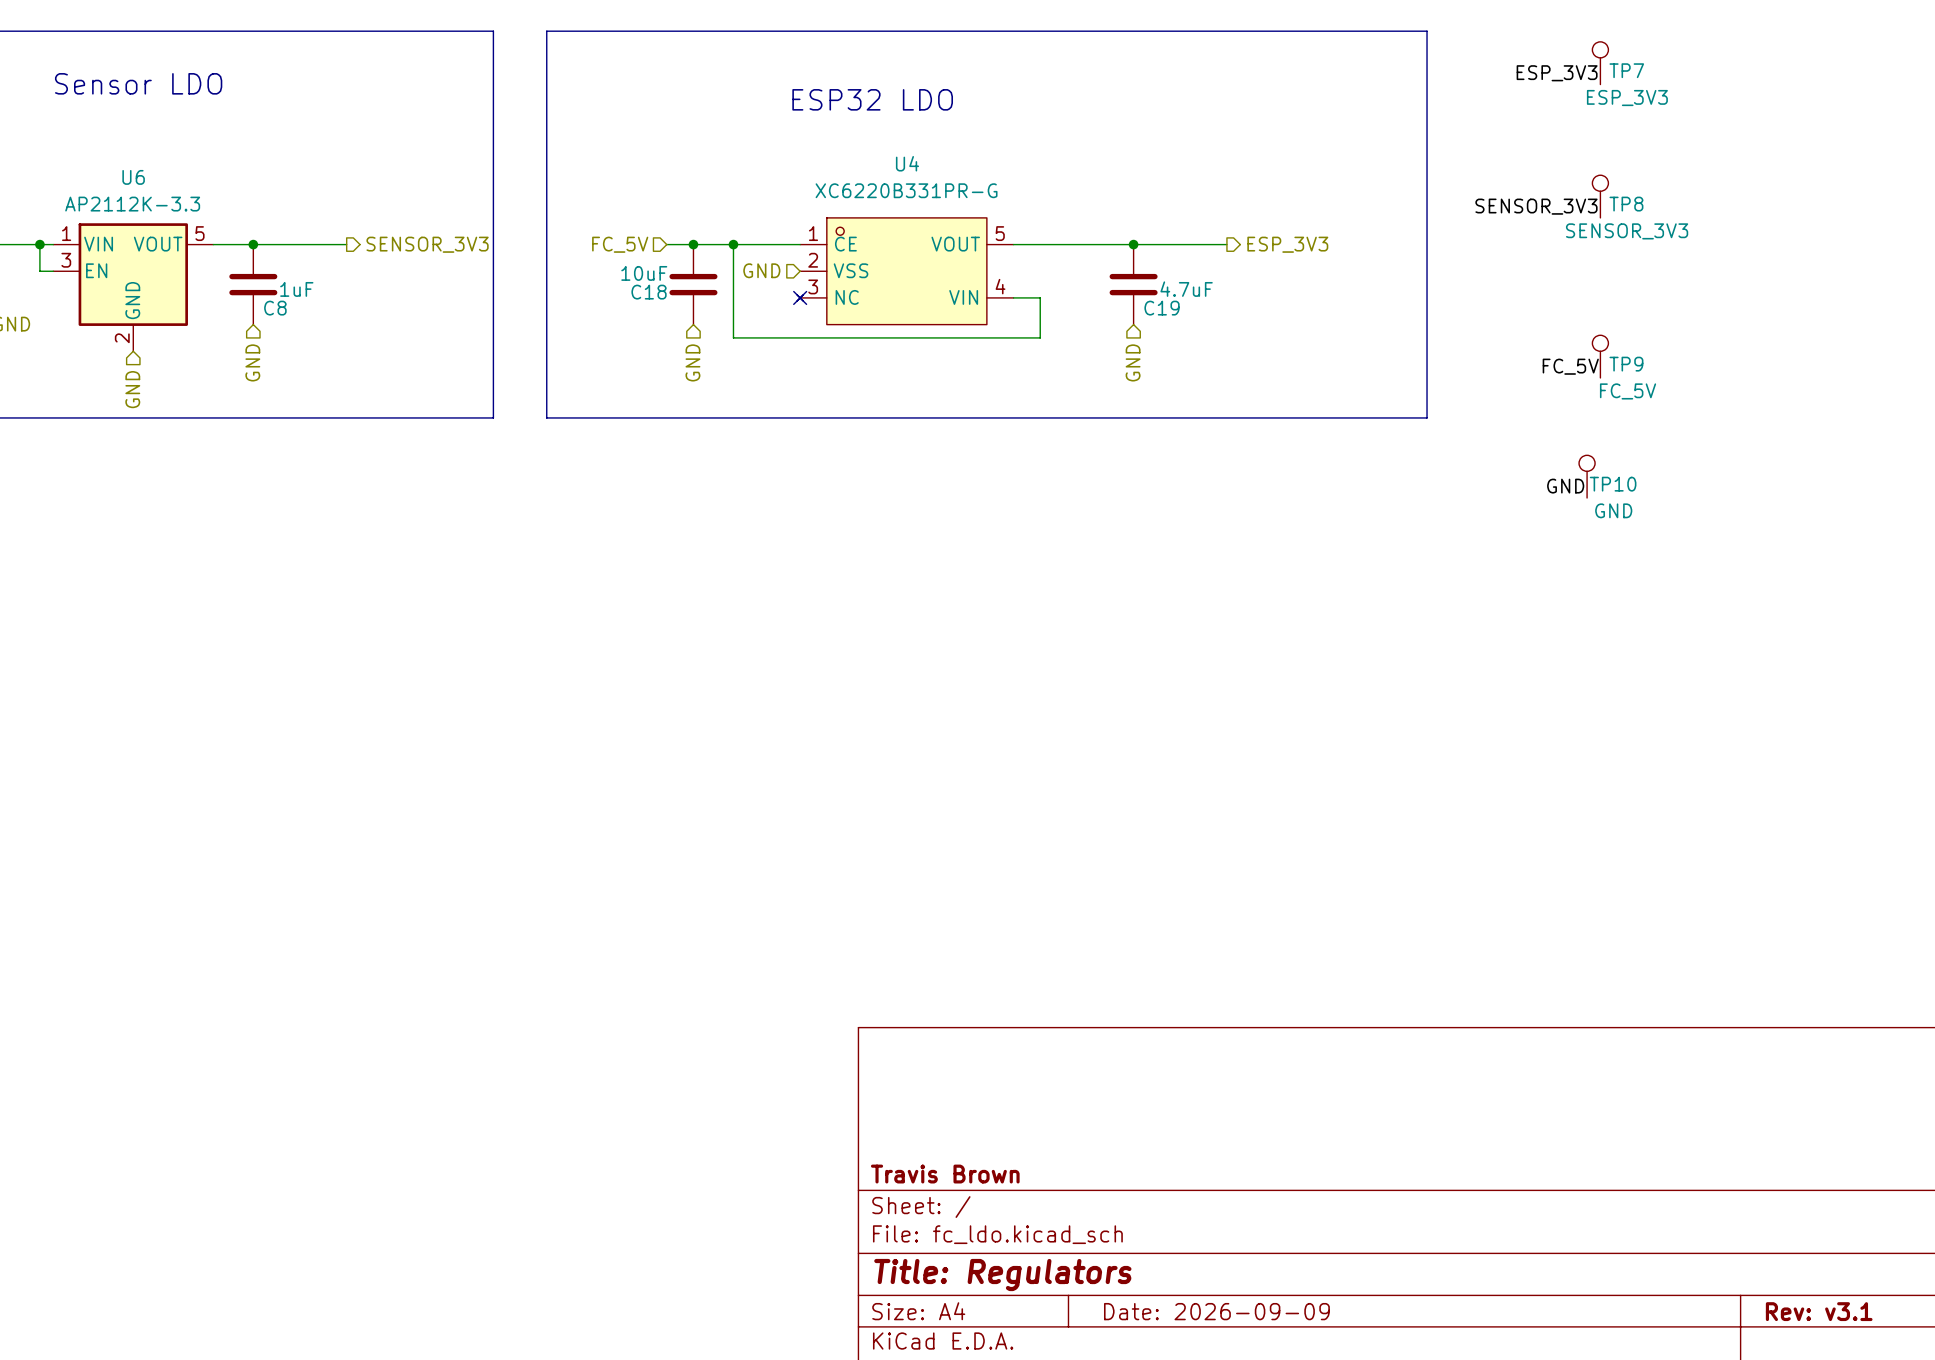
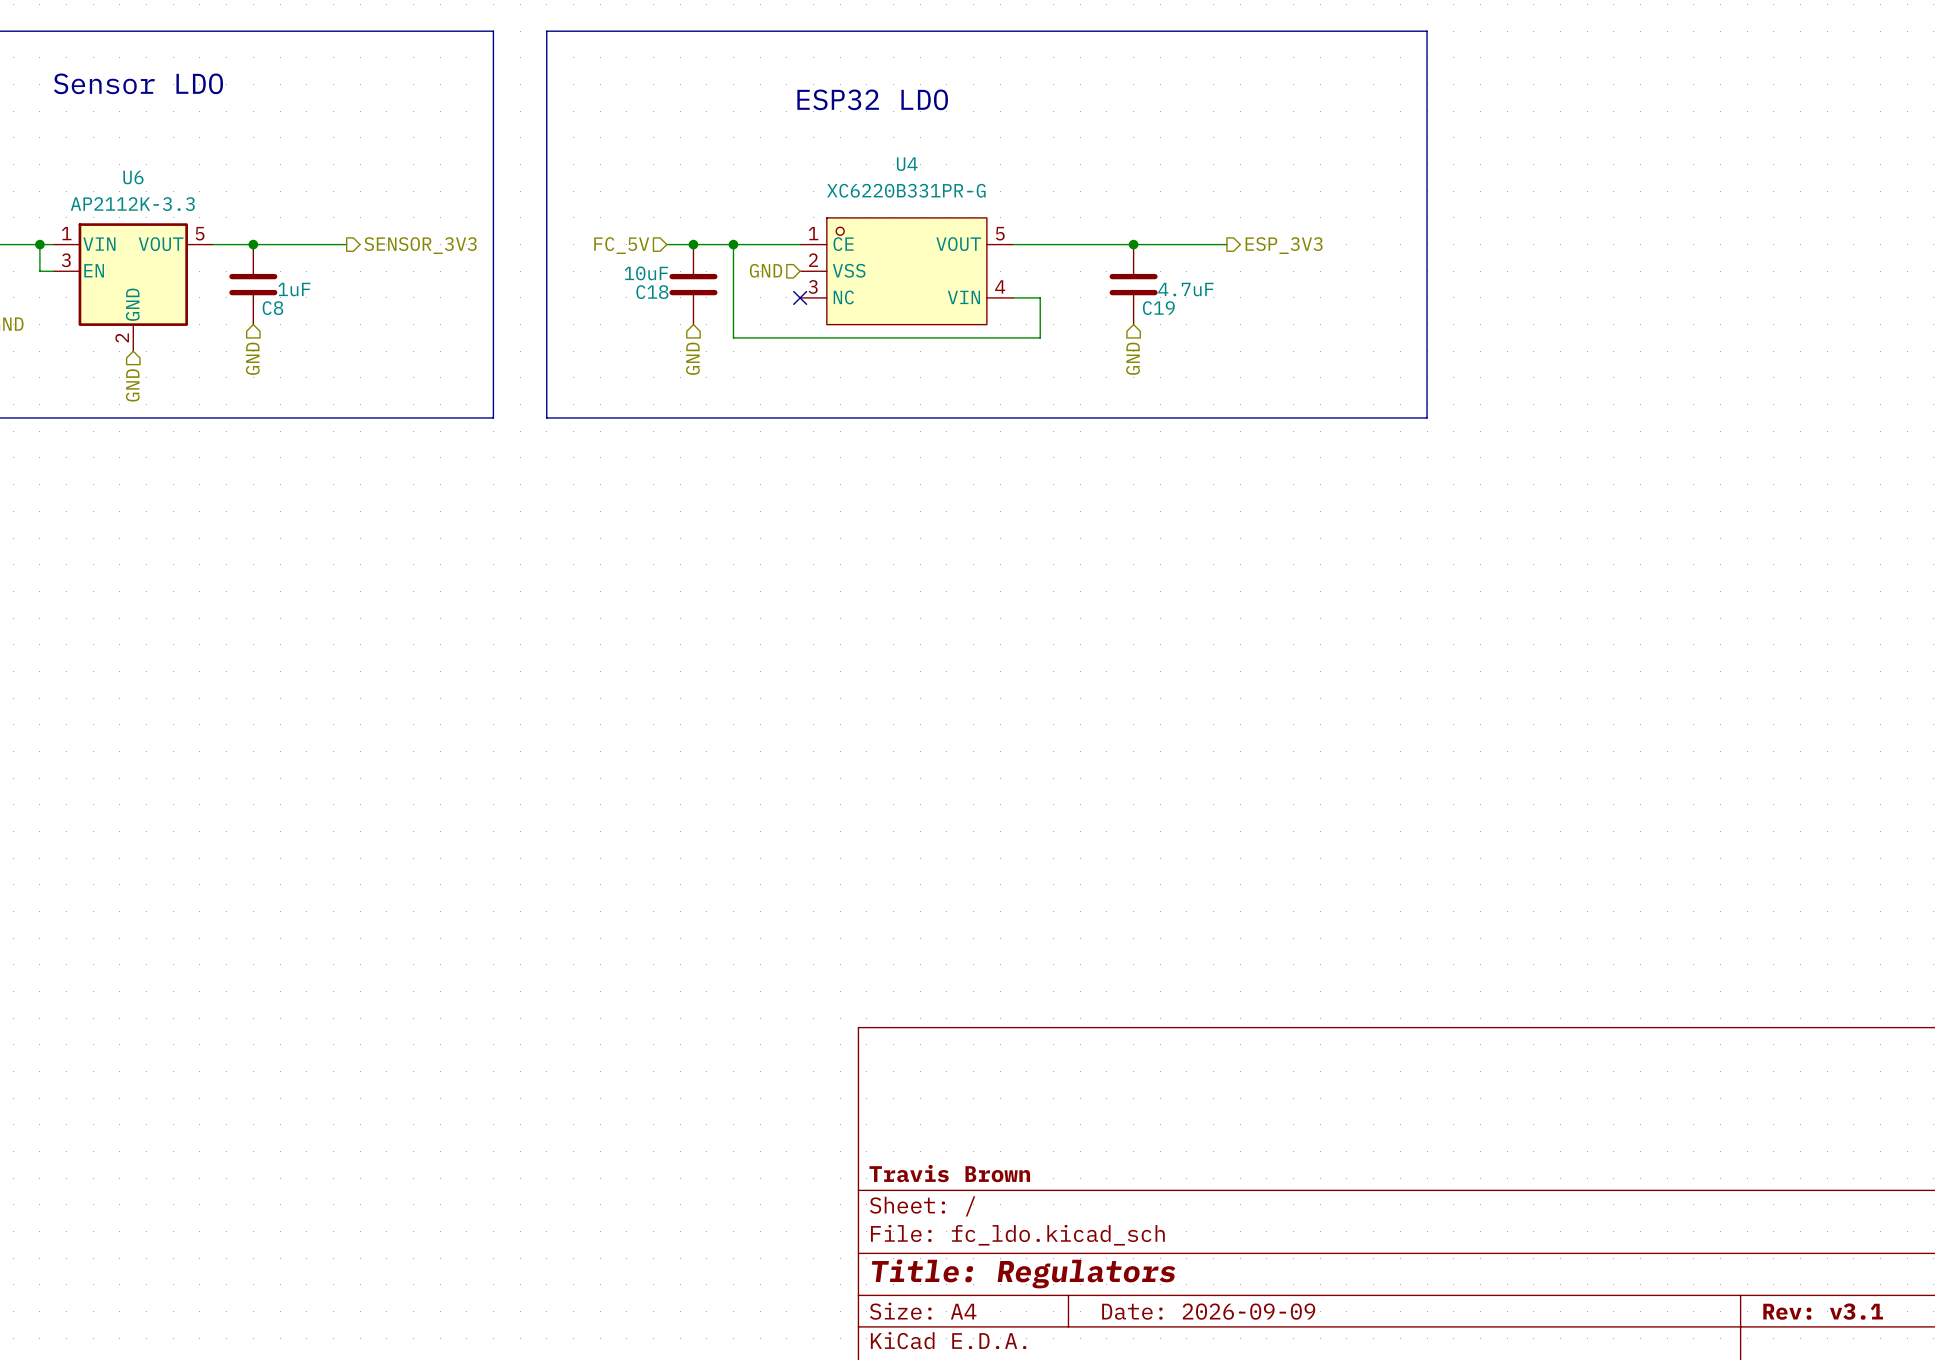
TP7: ESP_3V3 (1600, 63) -> none
label: ESP_3V3 (1557, 73) -> none
TP8: SENSOR_3V3 (1600, 196) -> none
label: SENSOR_3V3 (1536, 206) -> none
U4 symbol: [797, 217, 1014, 325] -> [800, 217, 1014, 325]
TP9: FC_5V (1600, 356) -> none
label: FC_5V (1570, 366) -> none
TP10: GND (1587, 476) -> none
label: GND (1565, 486) -> none

